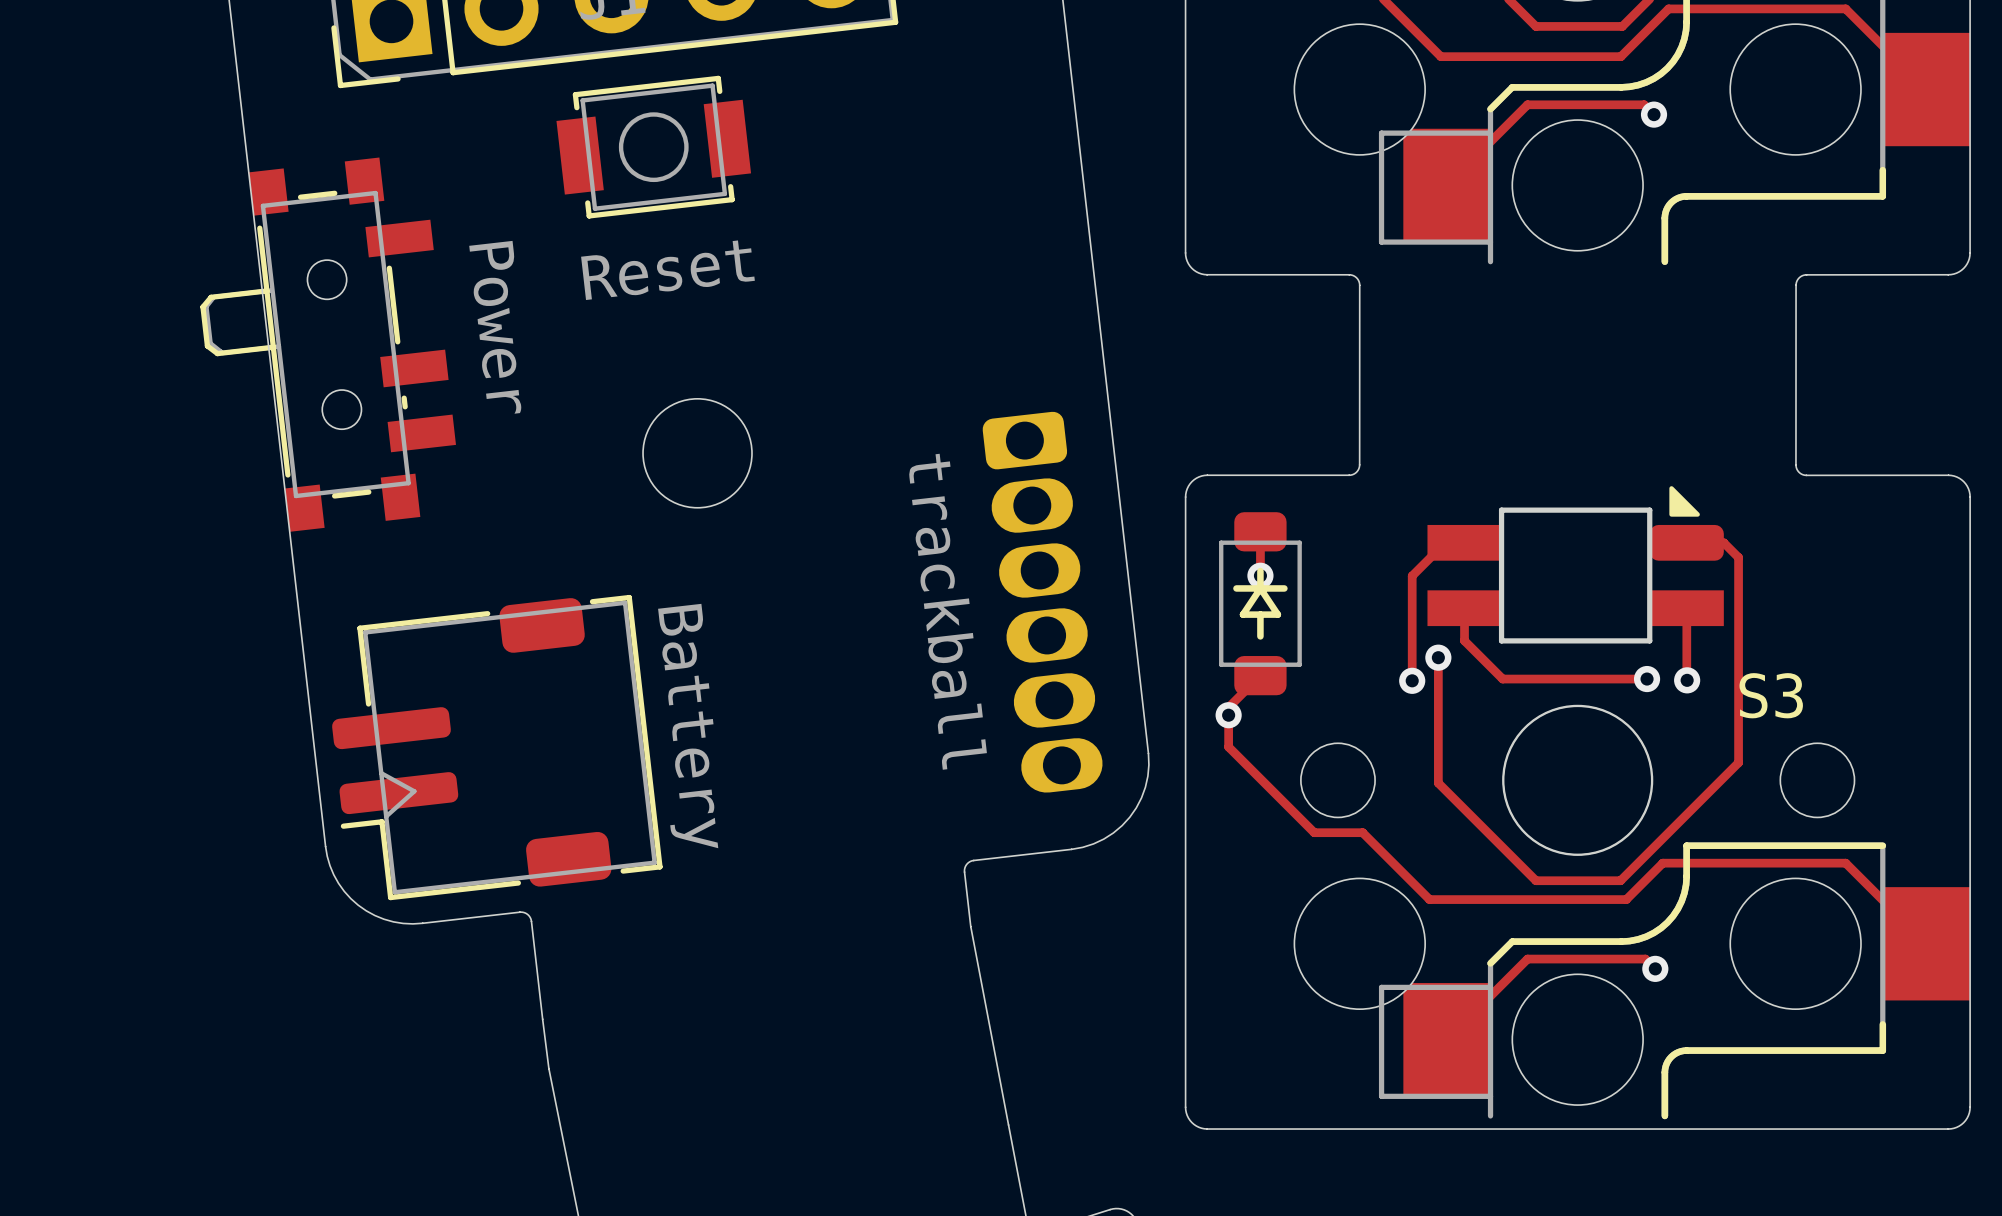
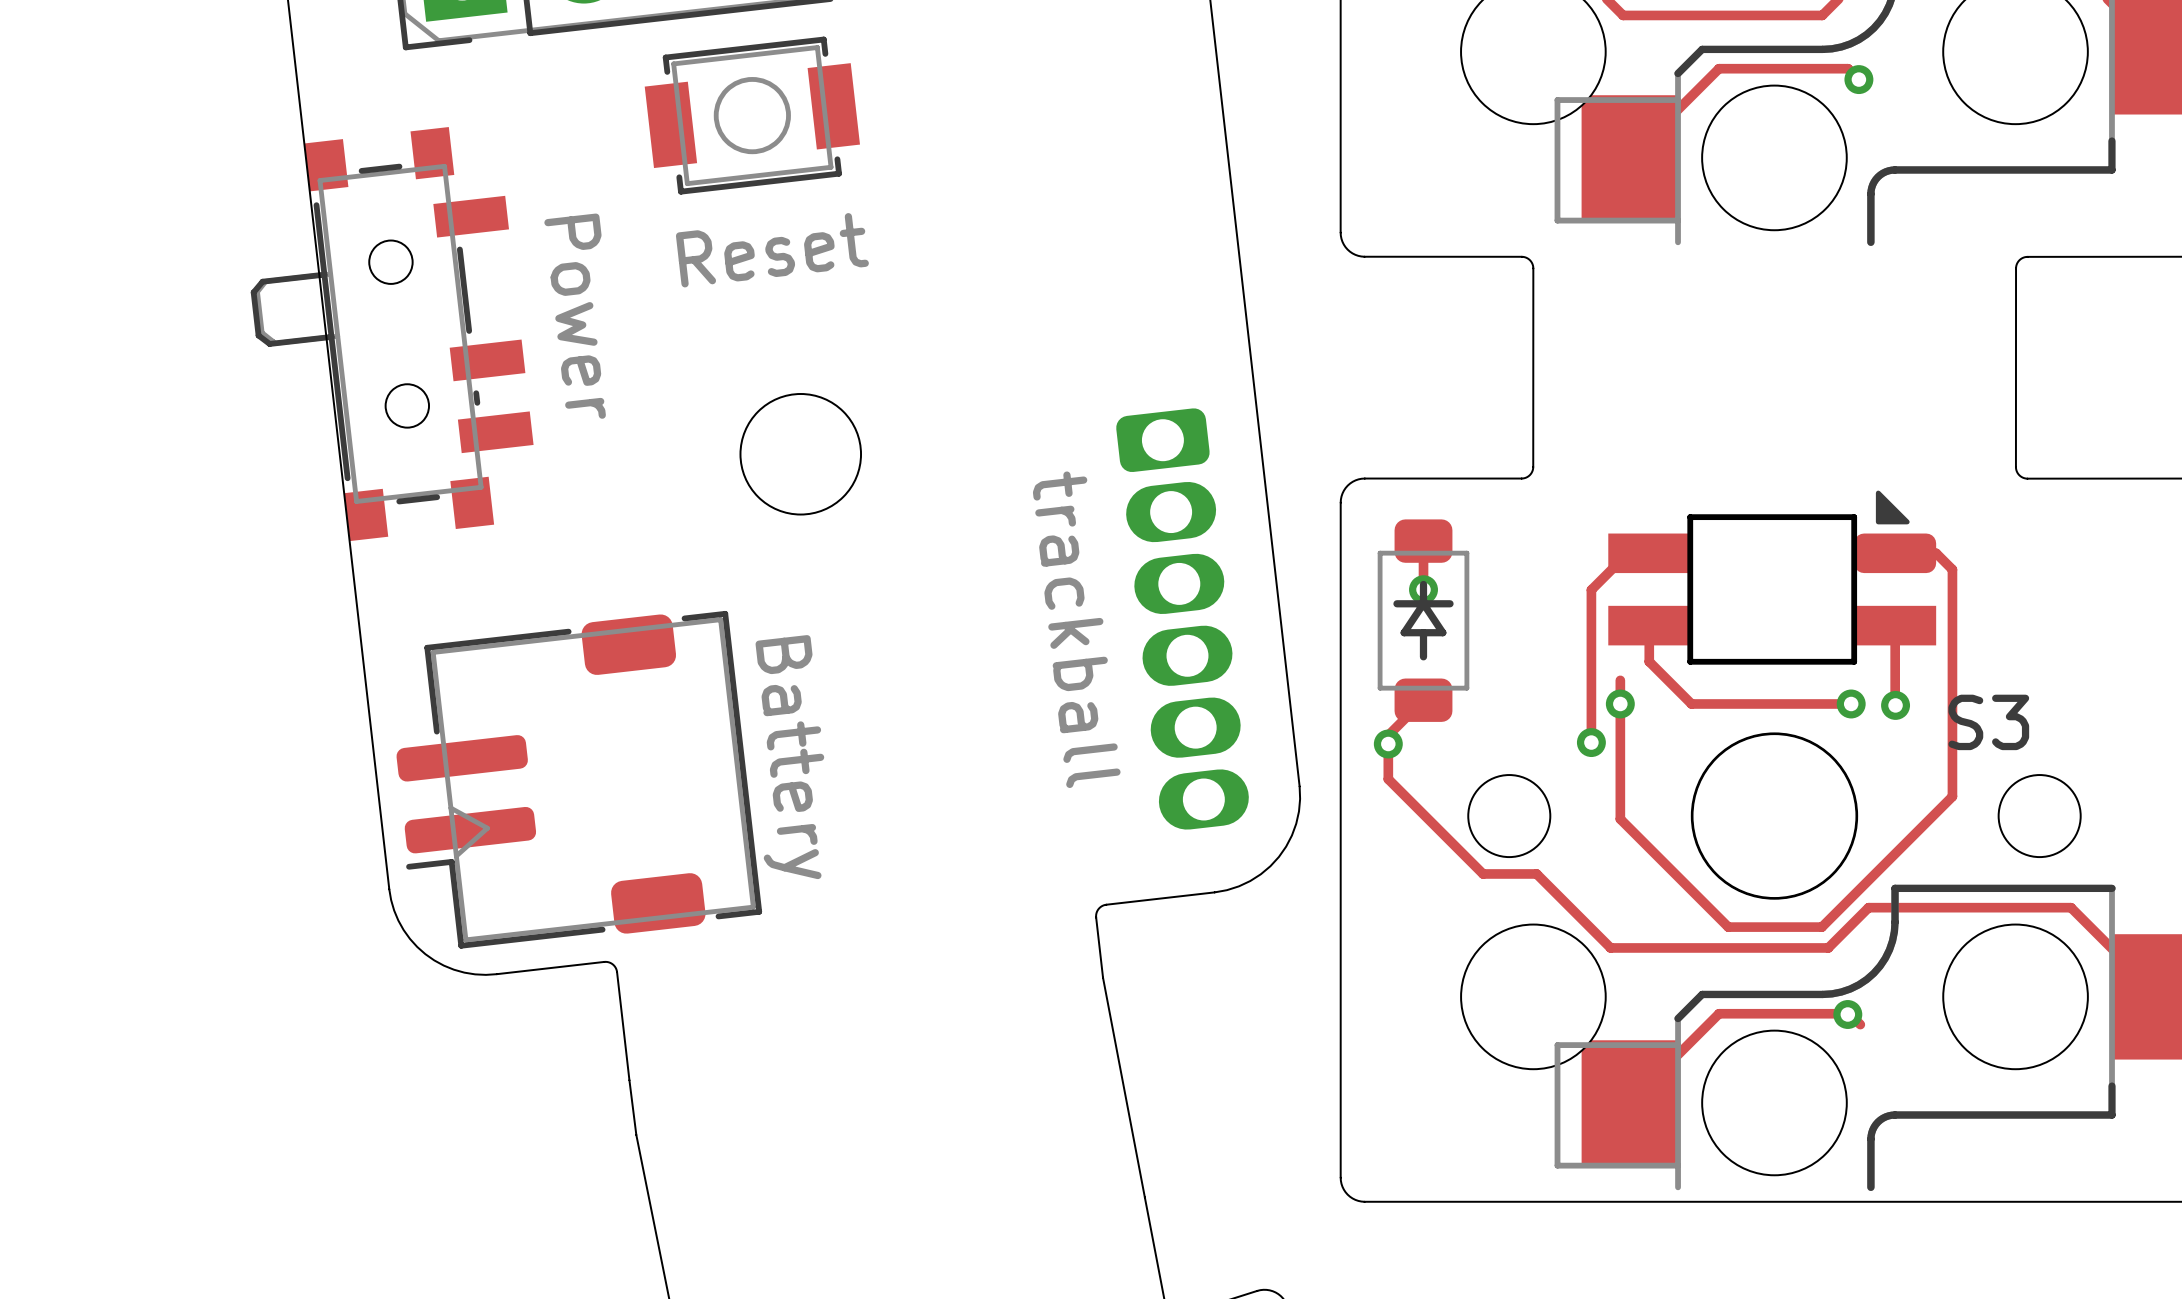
via position: (1438, 657) -> (1620, 703)
track: none -> (1591, 705) (1591, 742)
via: (1412, 680) -> none
via: none -> (1591, 742)
via position: (1655, 968) -> (1847, 1014)

